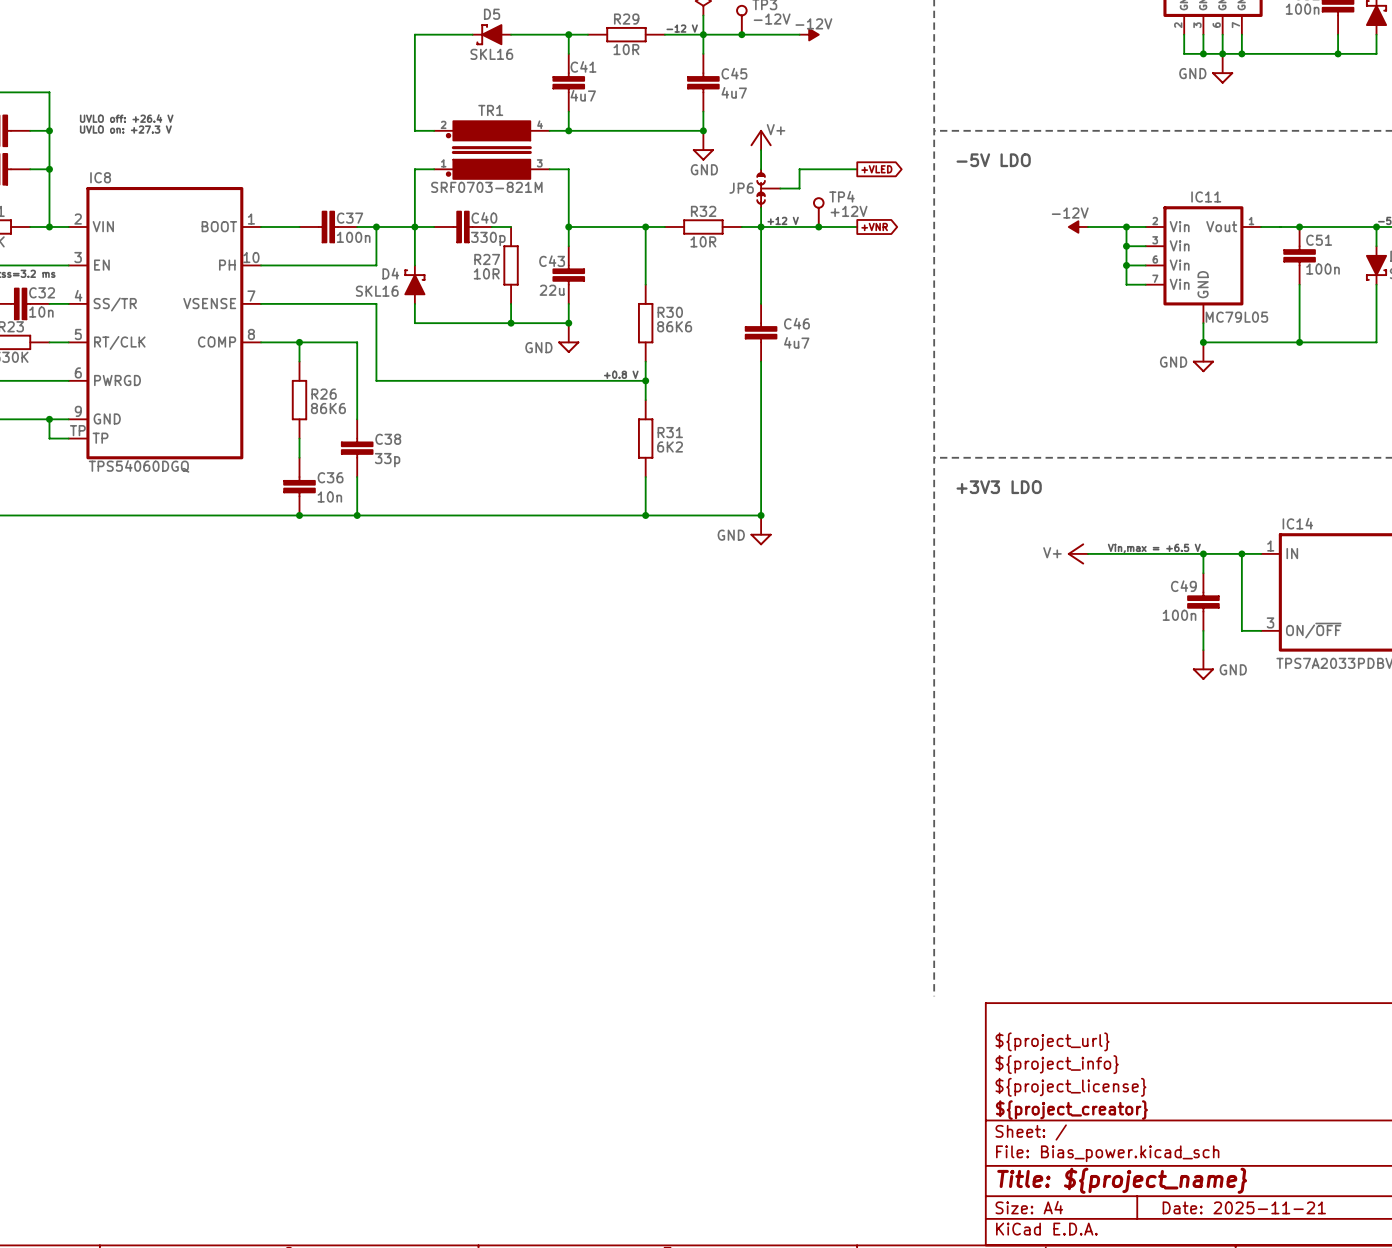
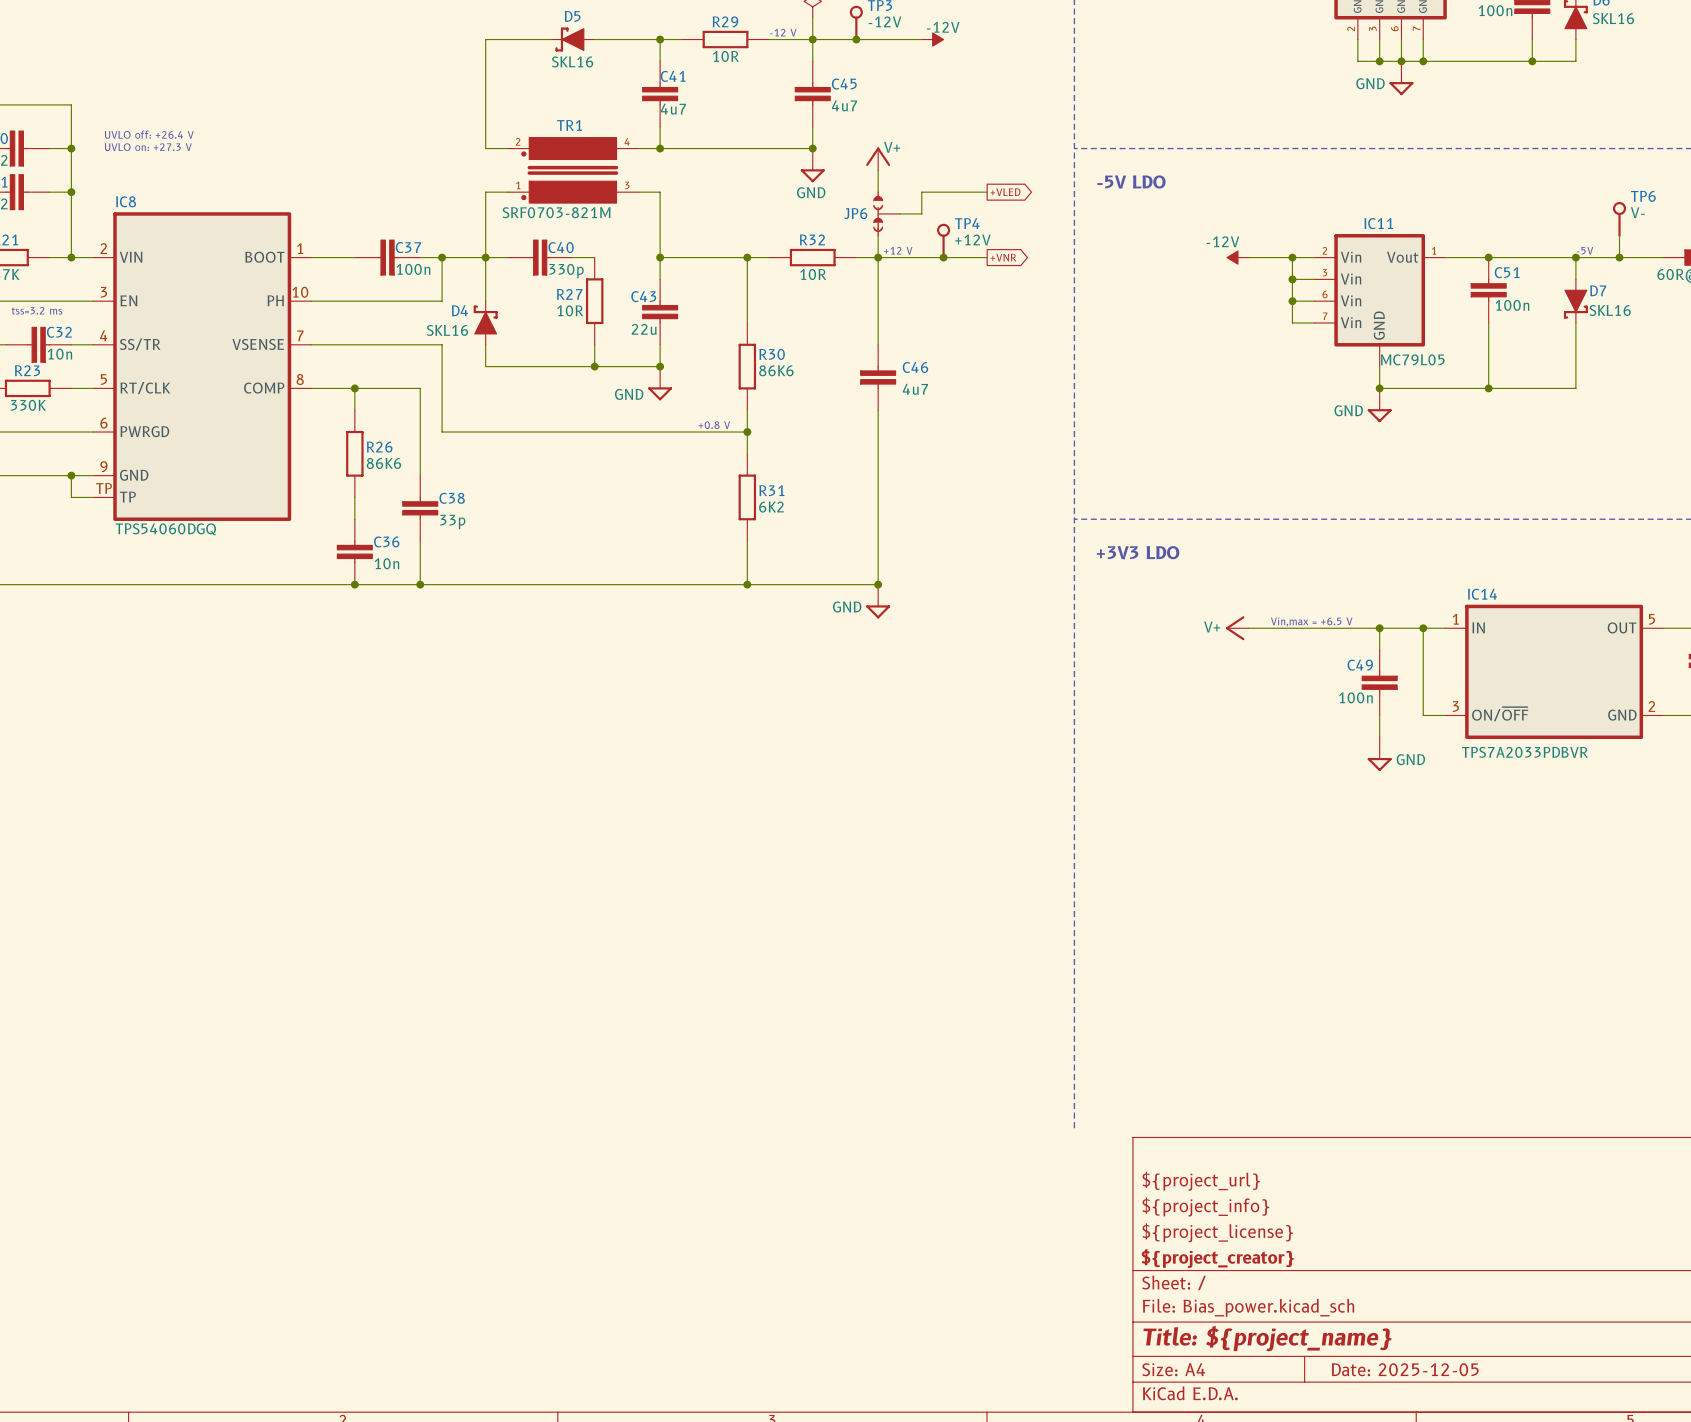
title block: Date: 2025-11-21 (1244, 1207) -> Date: 2025-12-05 (1405, 1369)

